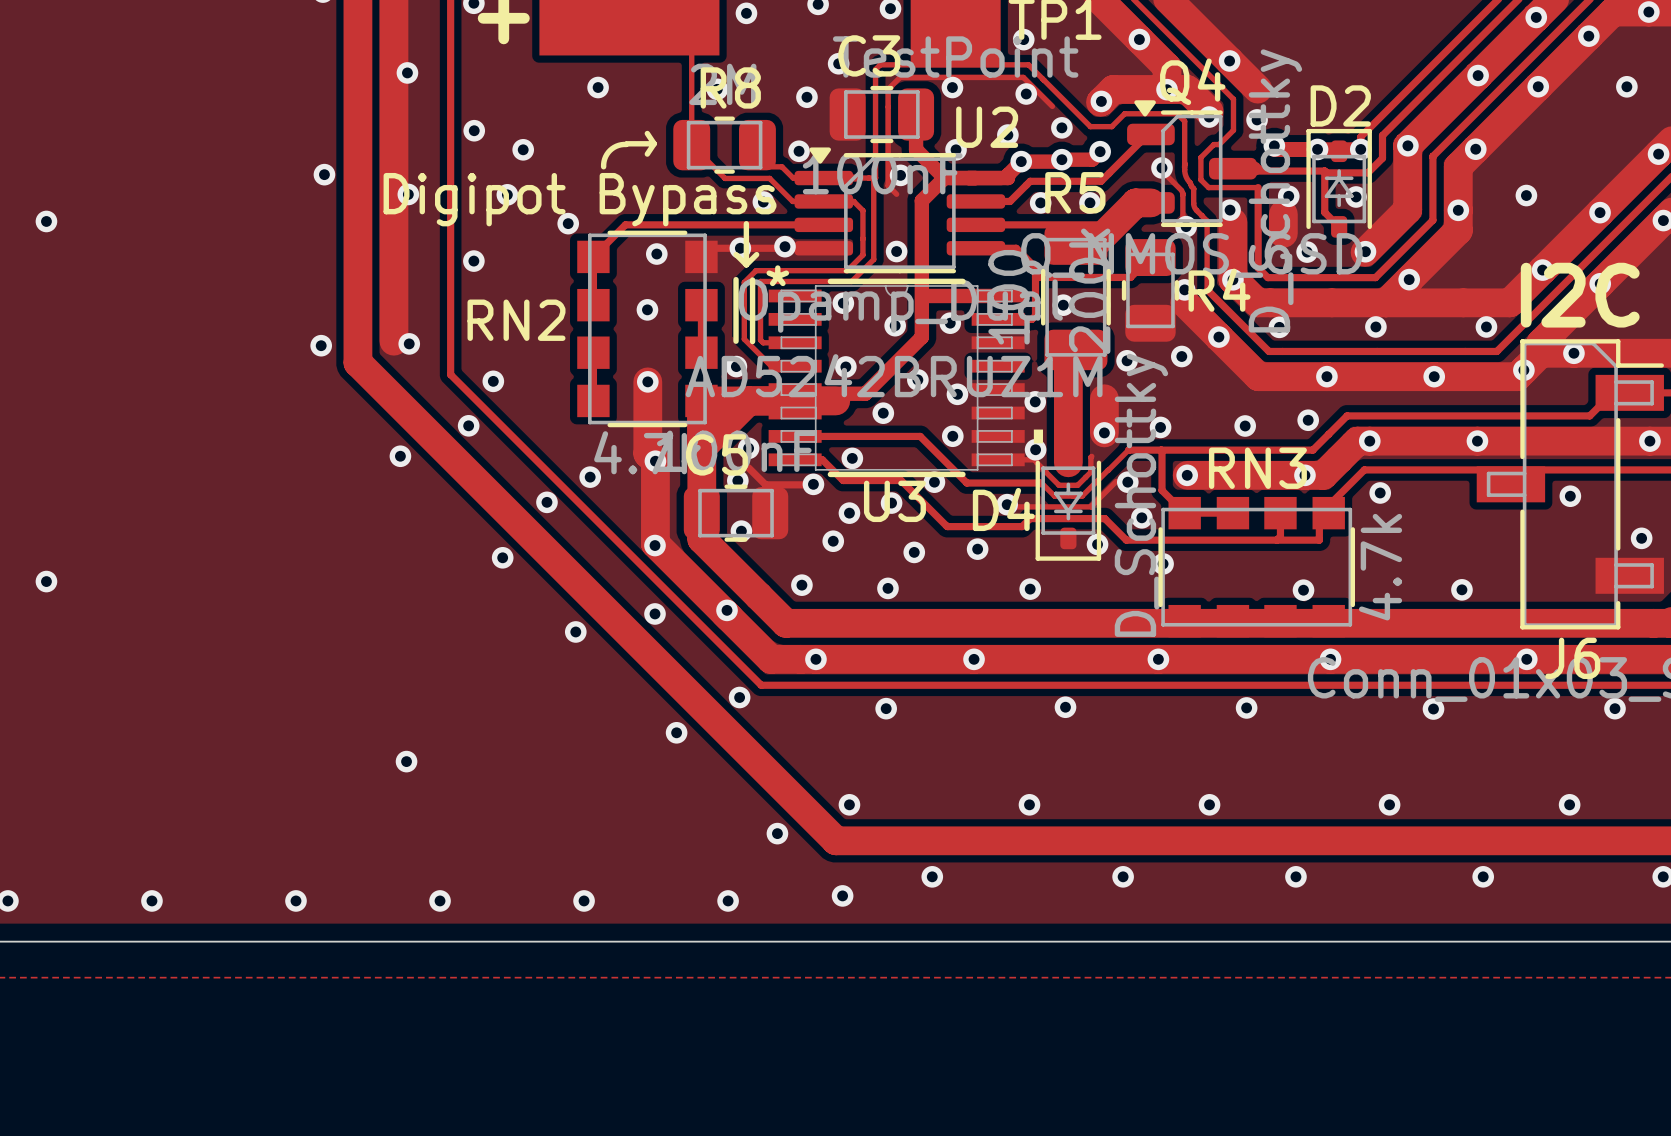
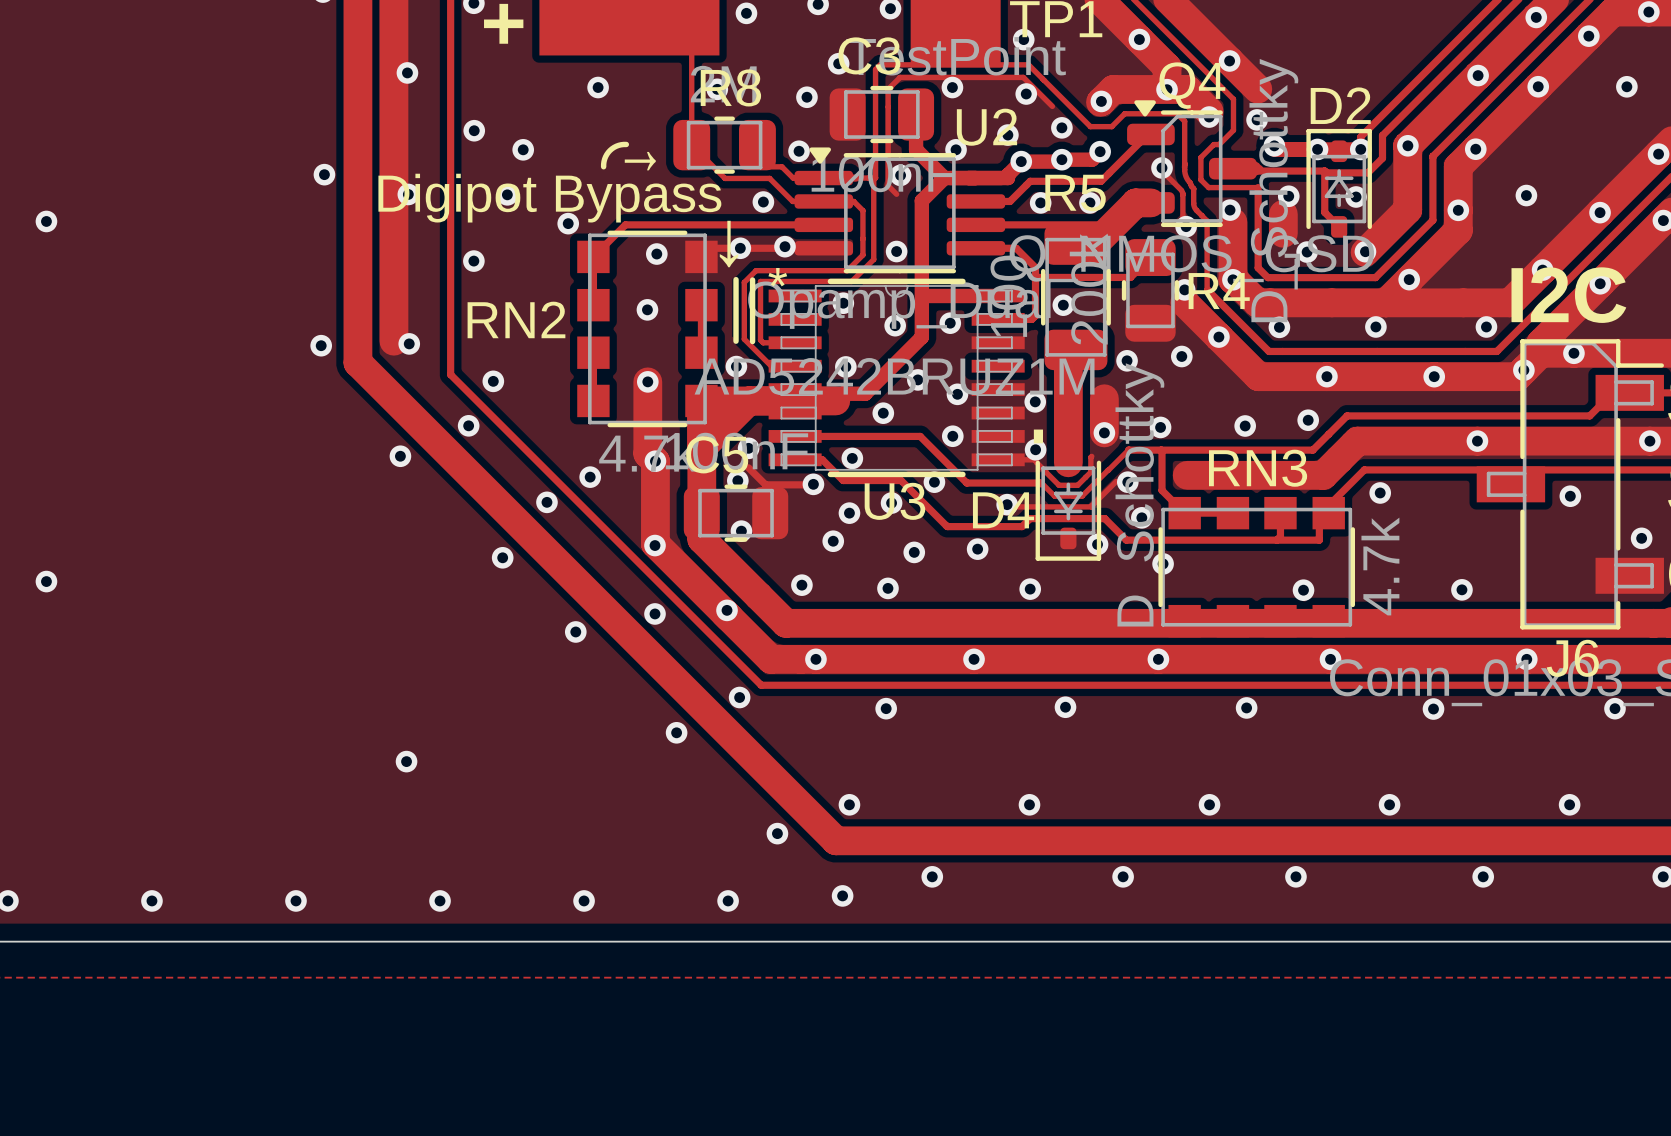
via: (1369, 441) -> none
via: (1187, 475) -> none
via: (1304, 475) -> none

